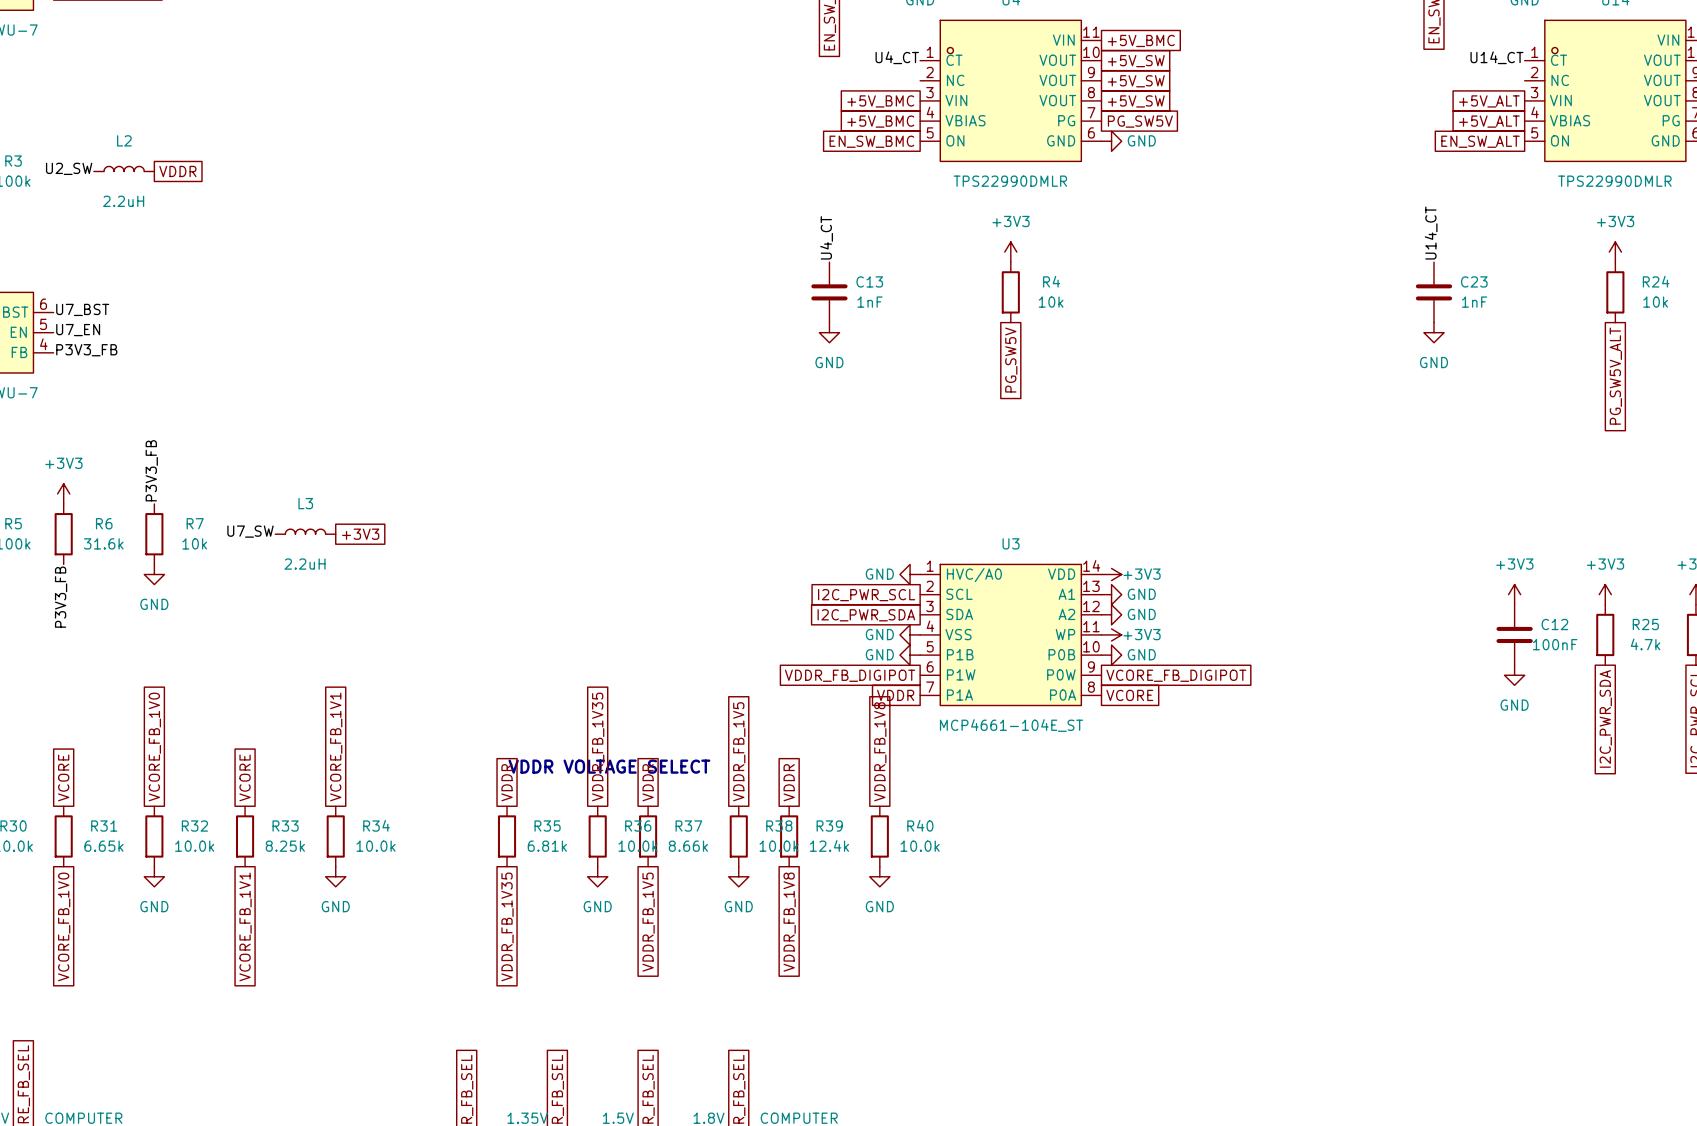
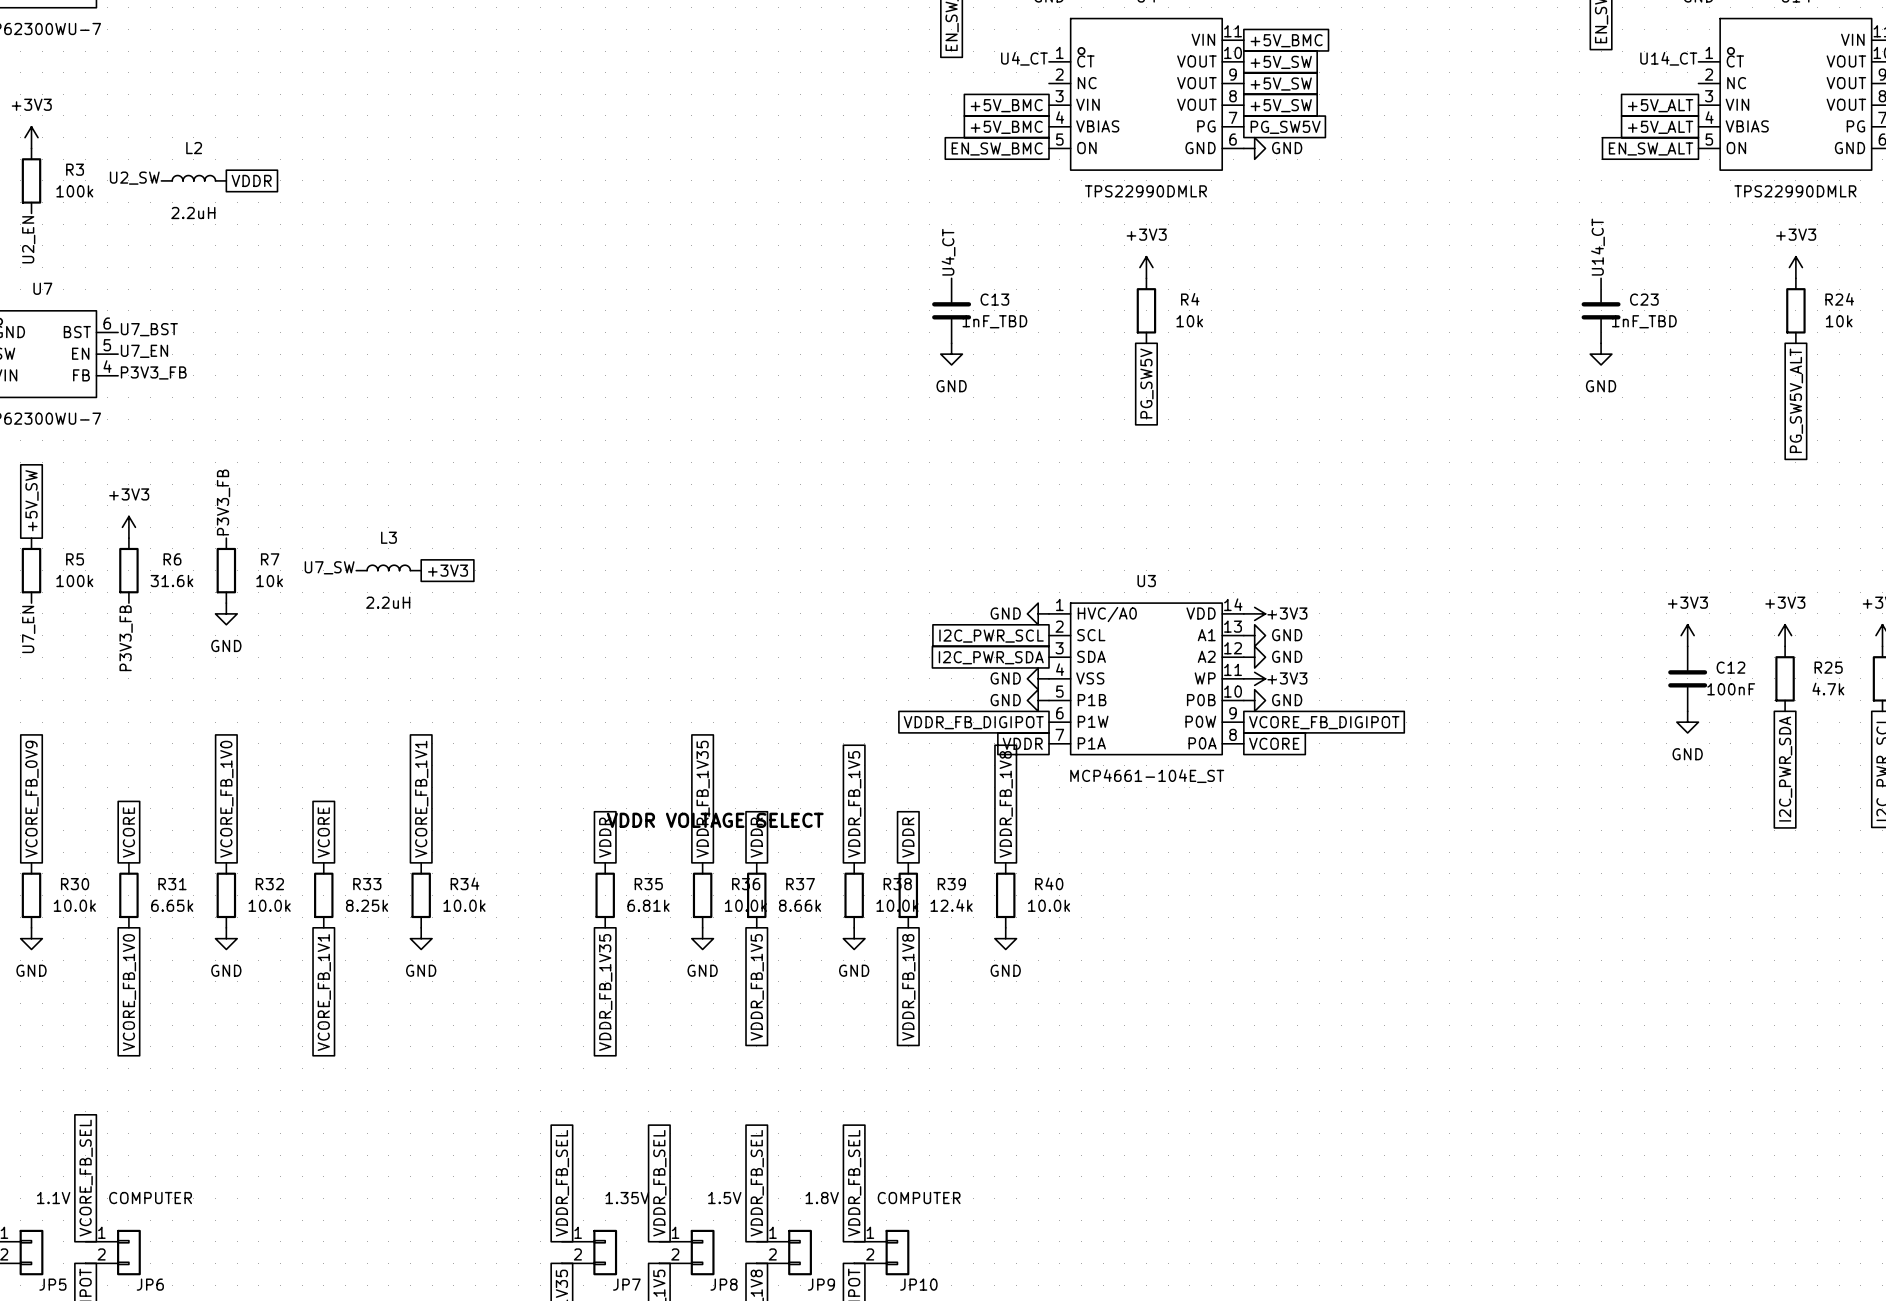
C13 value: 1nF (869, 302) -> 1nF_TBD (994, 321)
C23 value: 1nF (1474, 302) -> 1nF_TBD (1644, 321)

